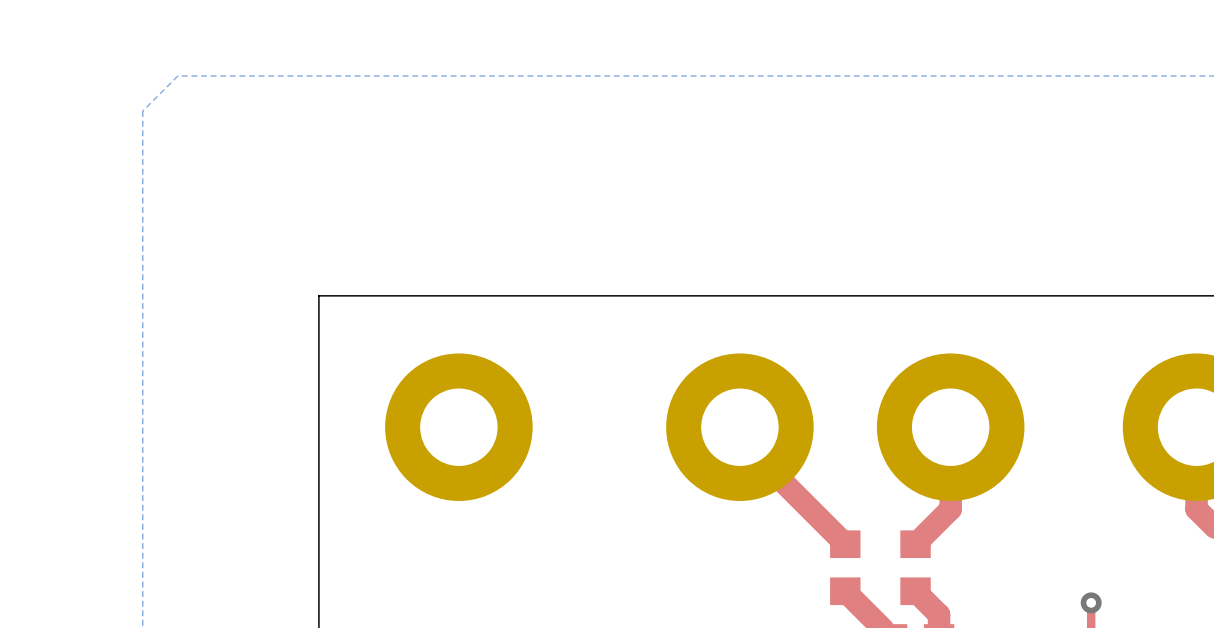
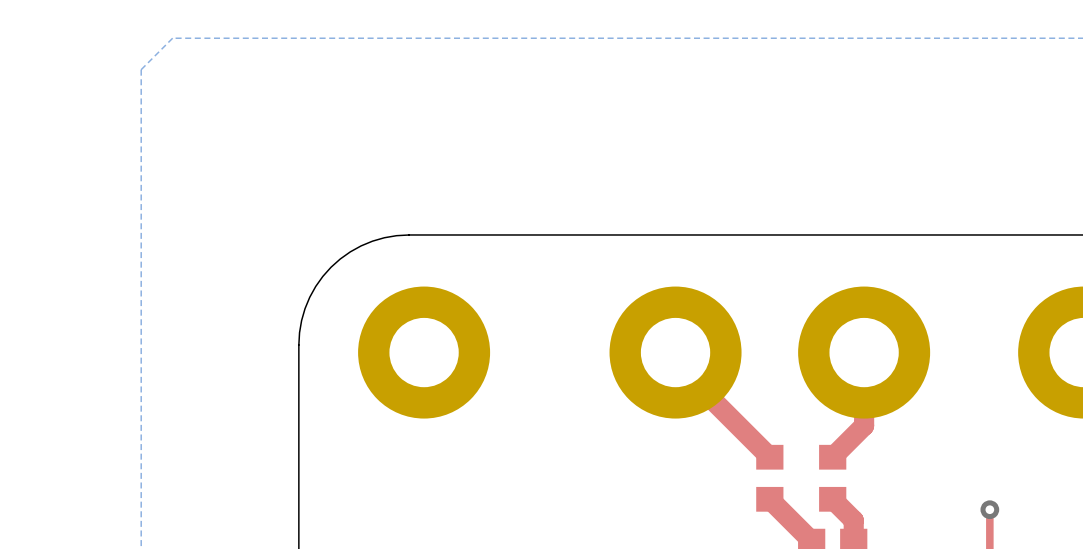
board edge: (441, 295) (318, 295) (318, 418) -> (408, 234) (372, 241) (350, 251) (331, 267) (315, 286) (305, 308) (298, 345)

